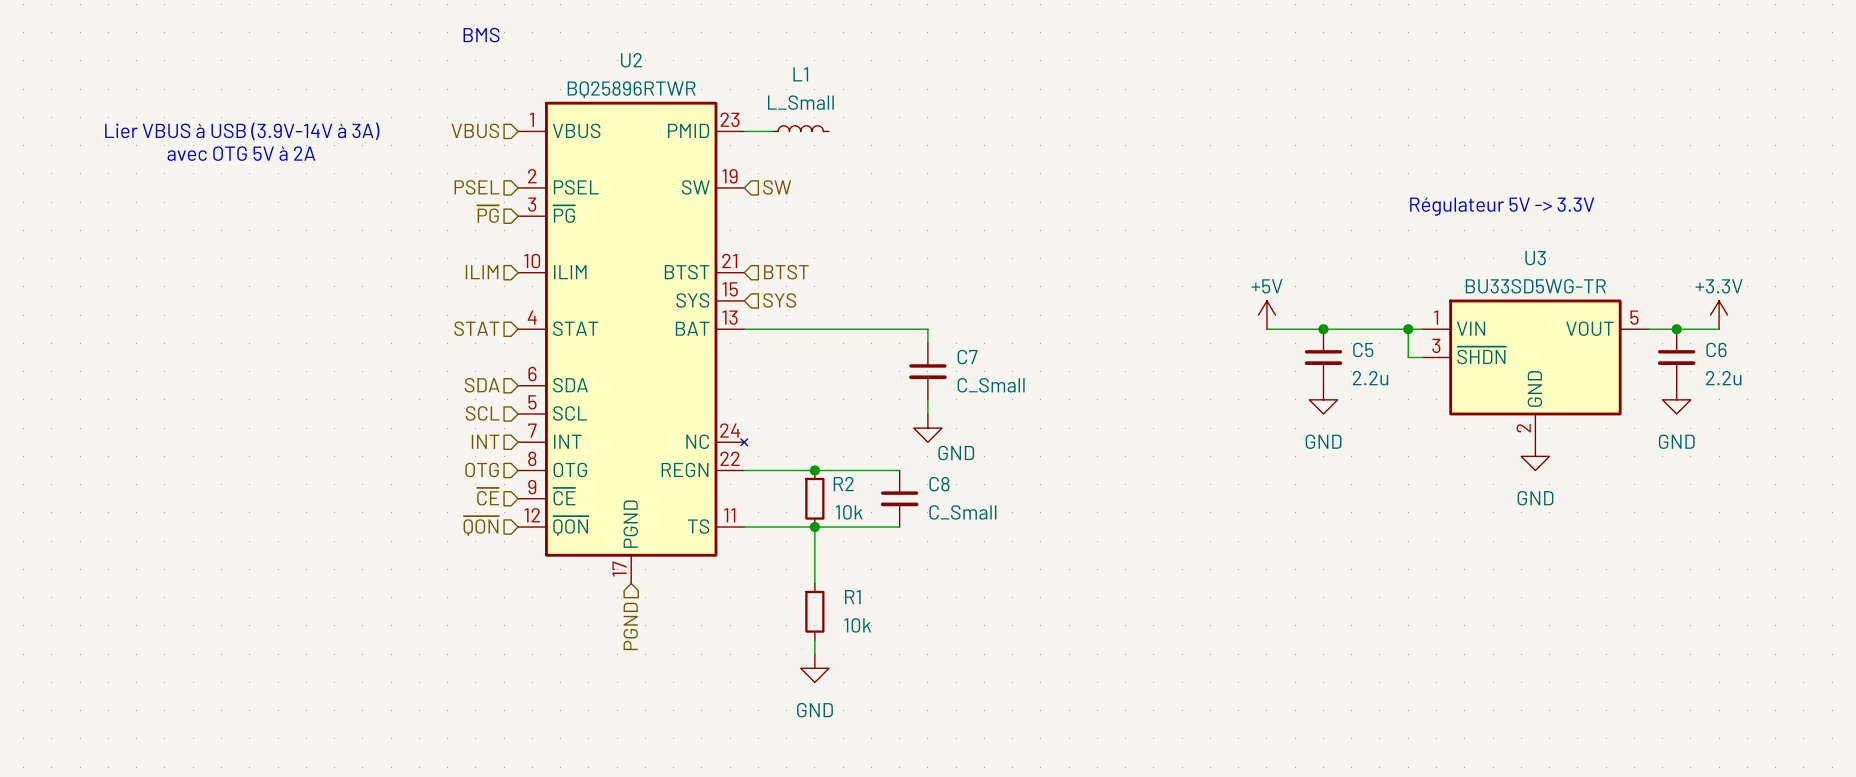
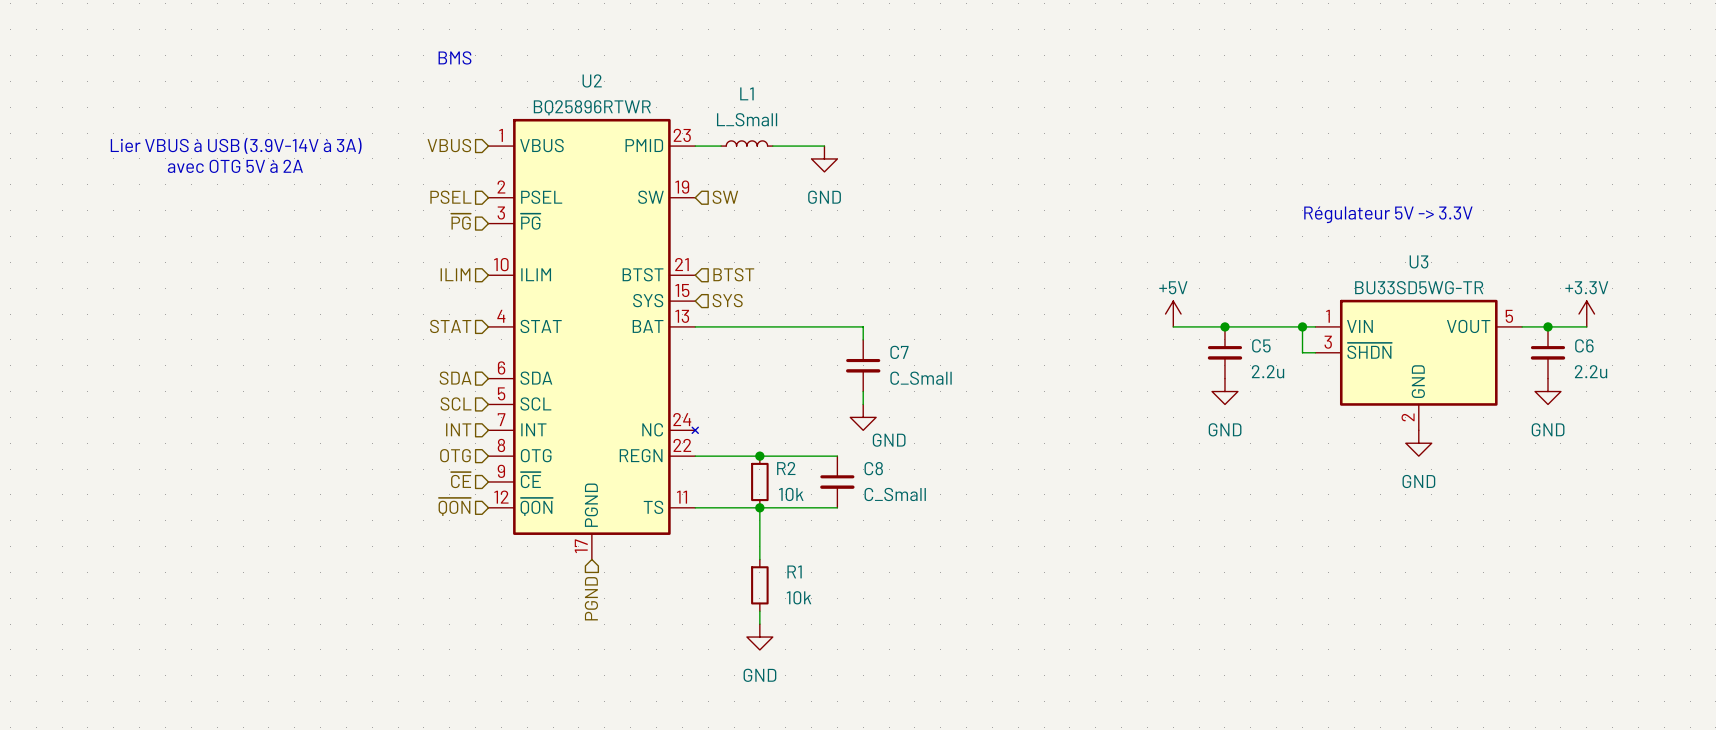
wire: none -> (772, 146) (824, 146)
power symbol: none -> GND (824, 158)

